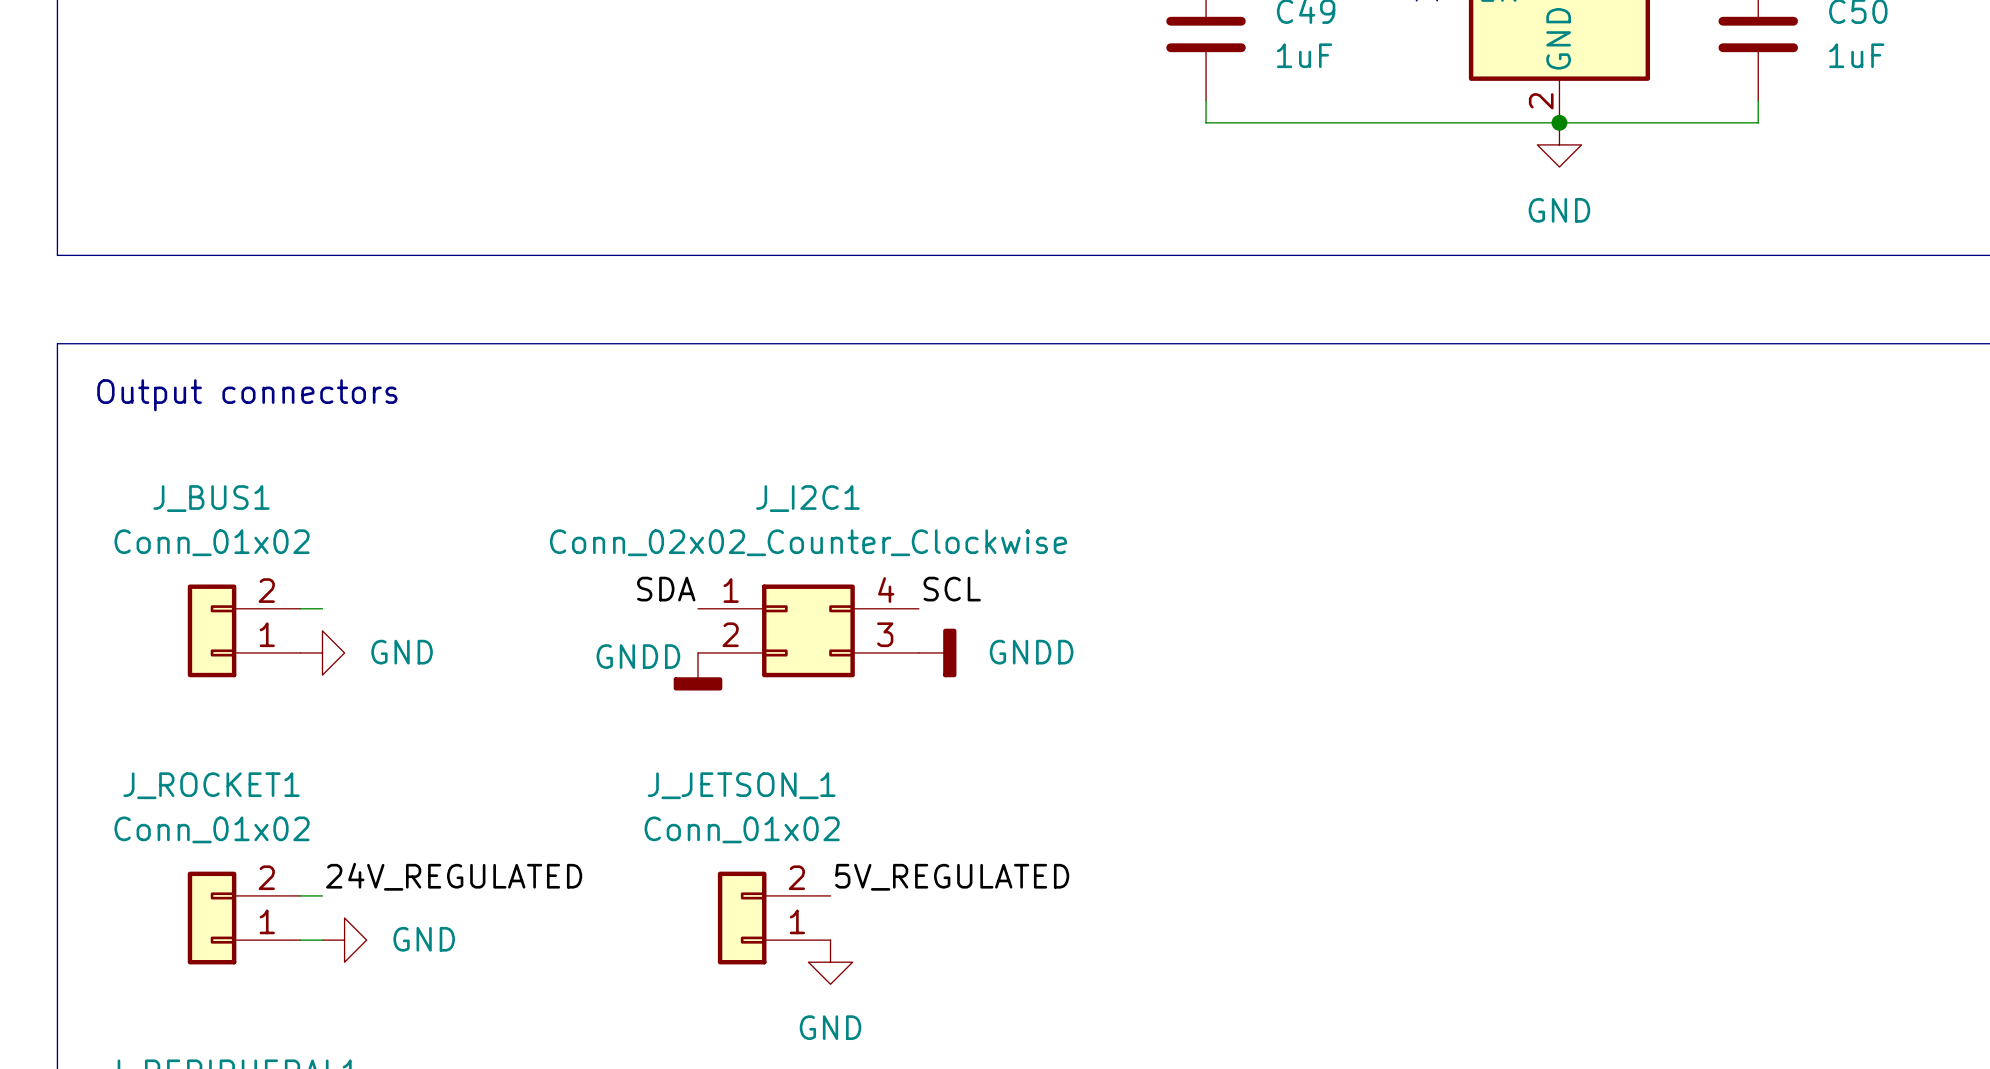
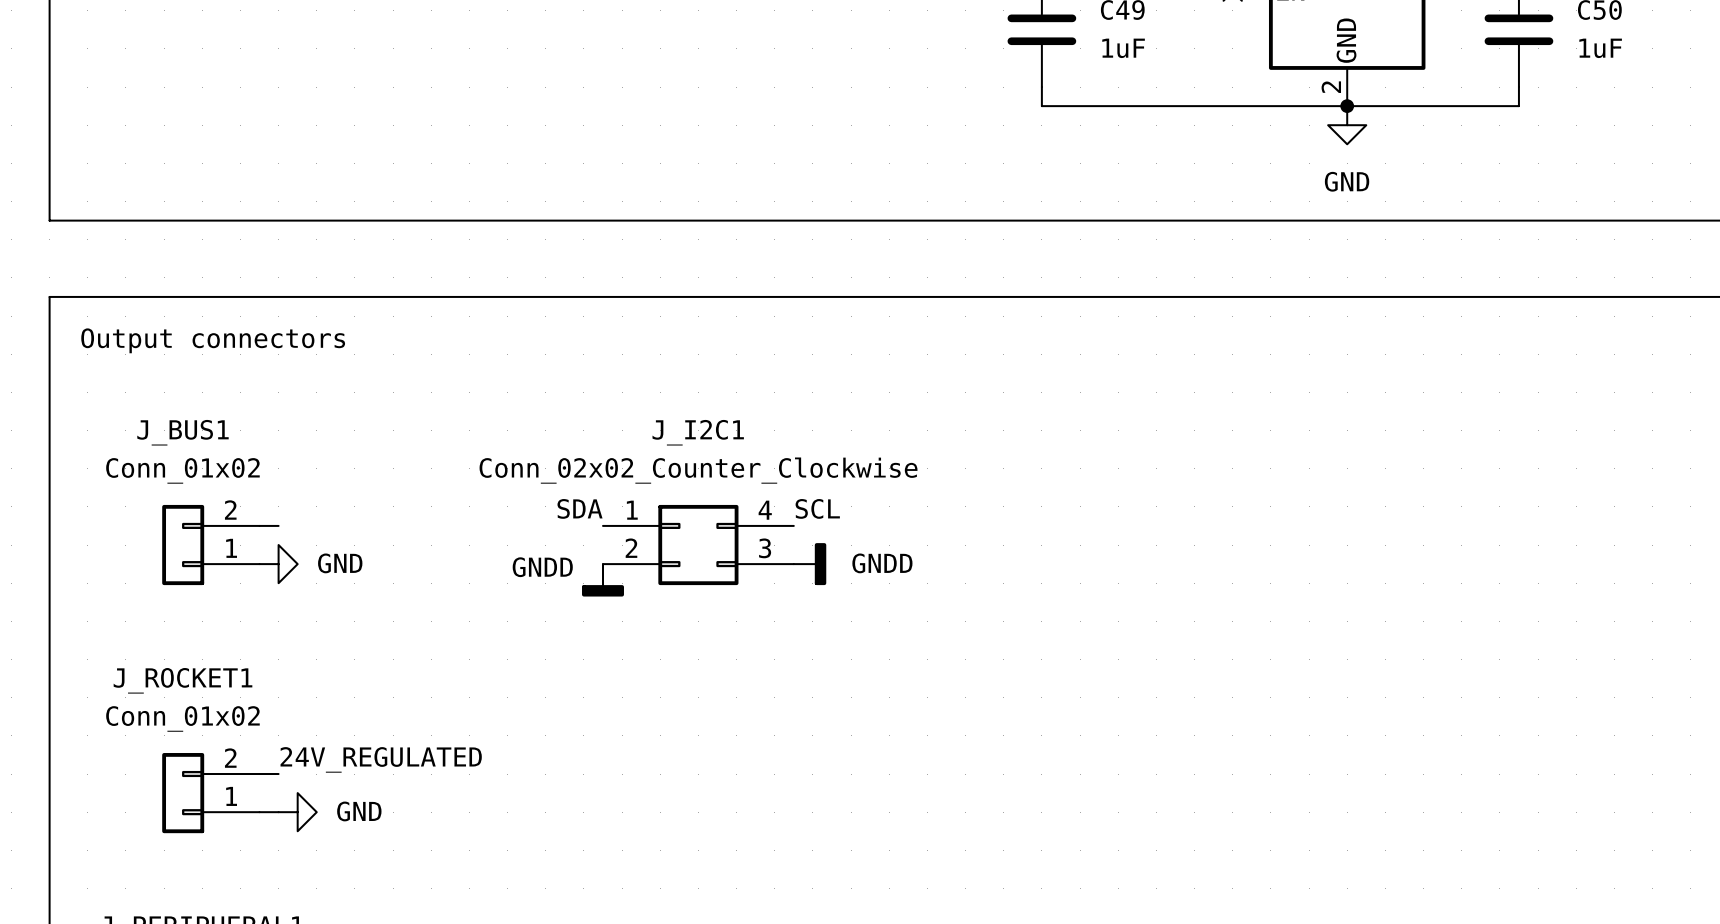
label: 5V_REGULATED (952, 877) -> none
J_JETSON_1: Conn_01x02 (774, 918) -> none
power symbol: GND (830, 962) -> none

